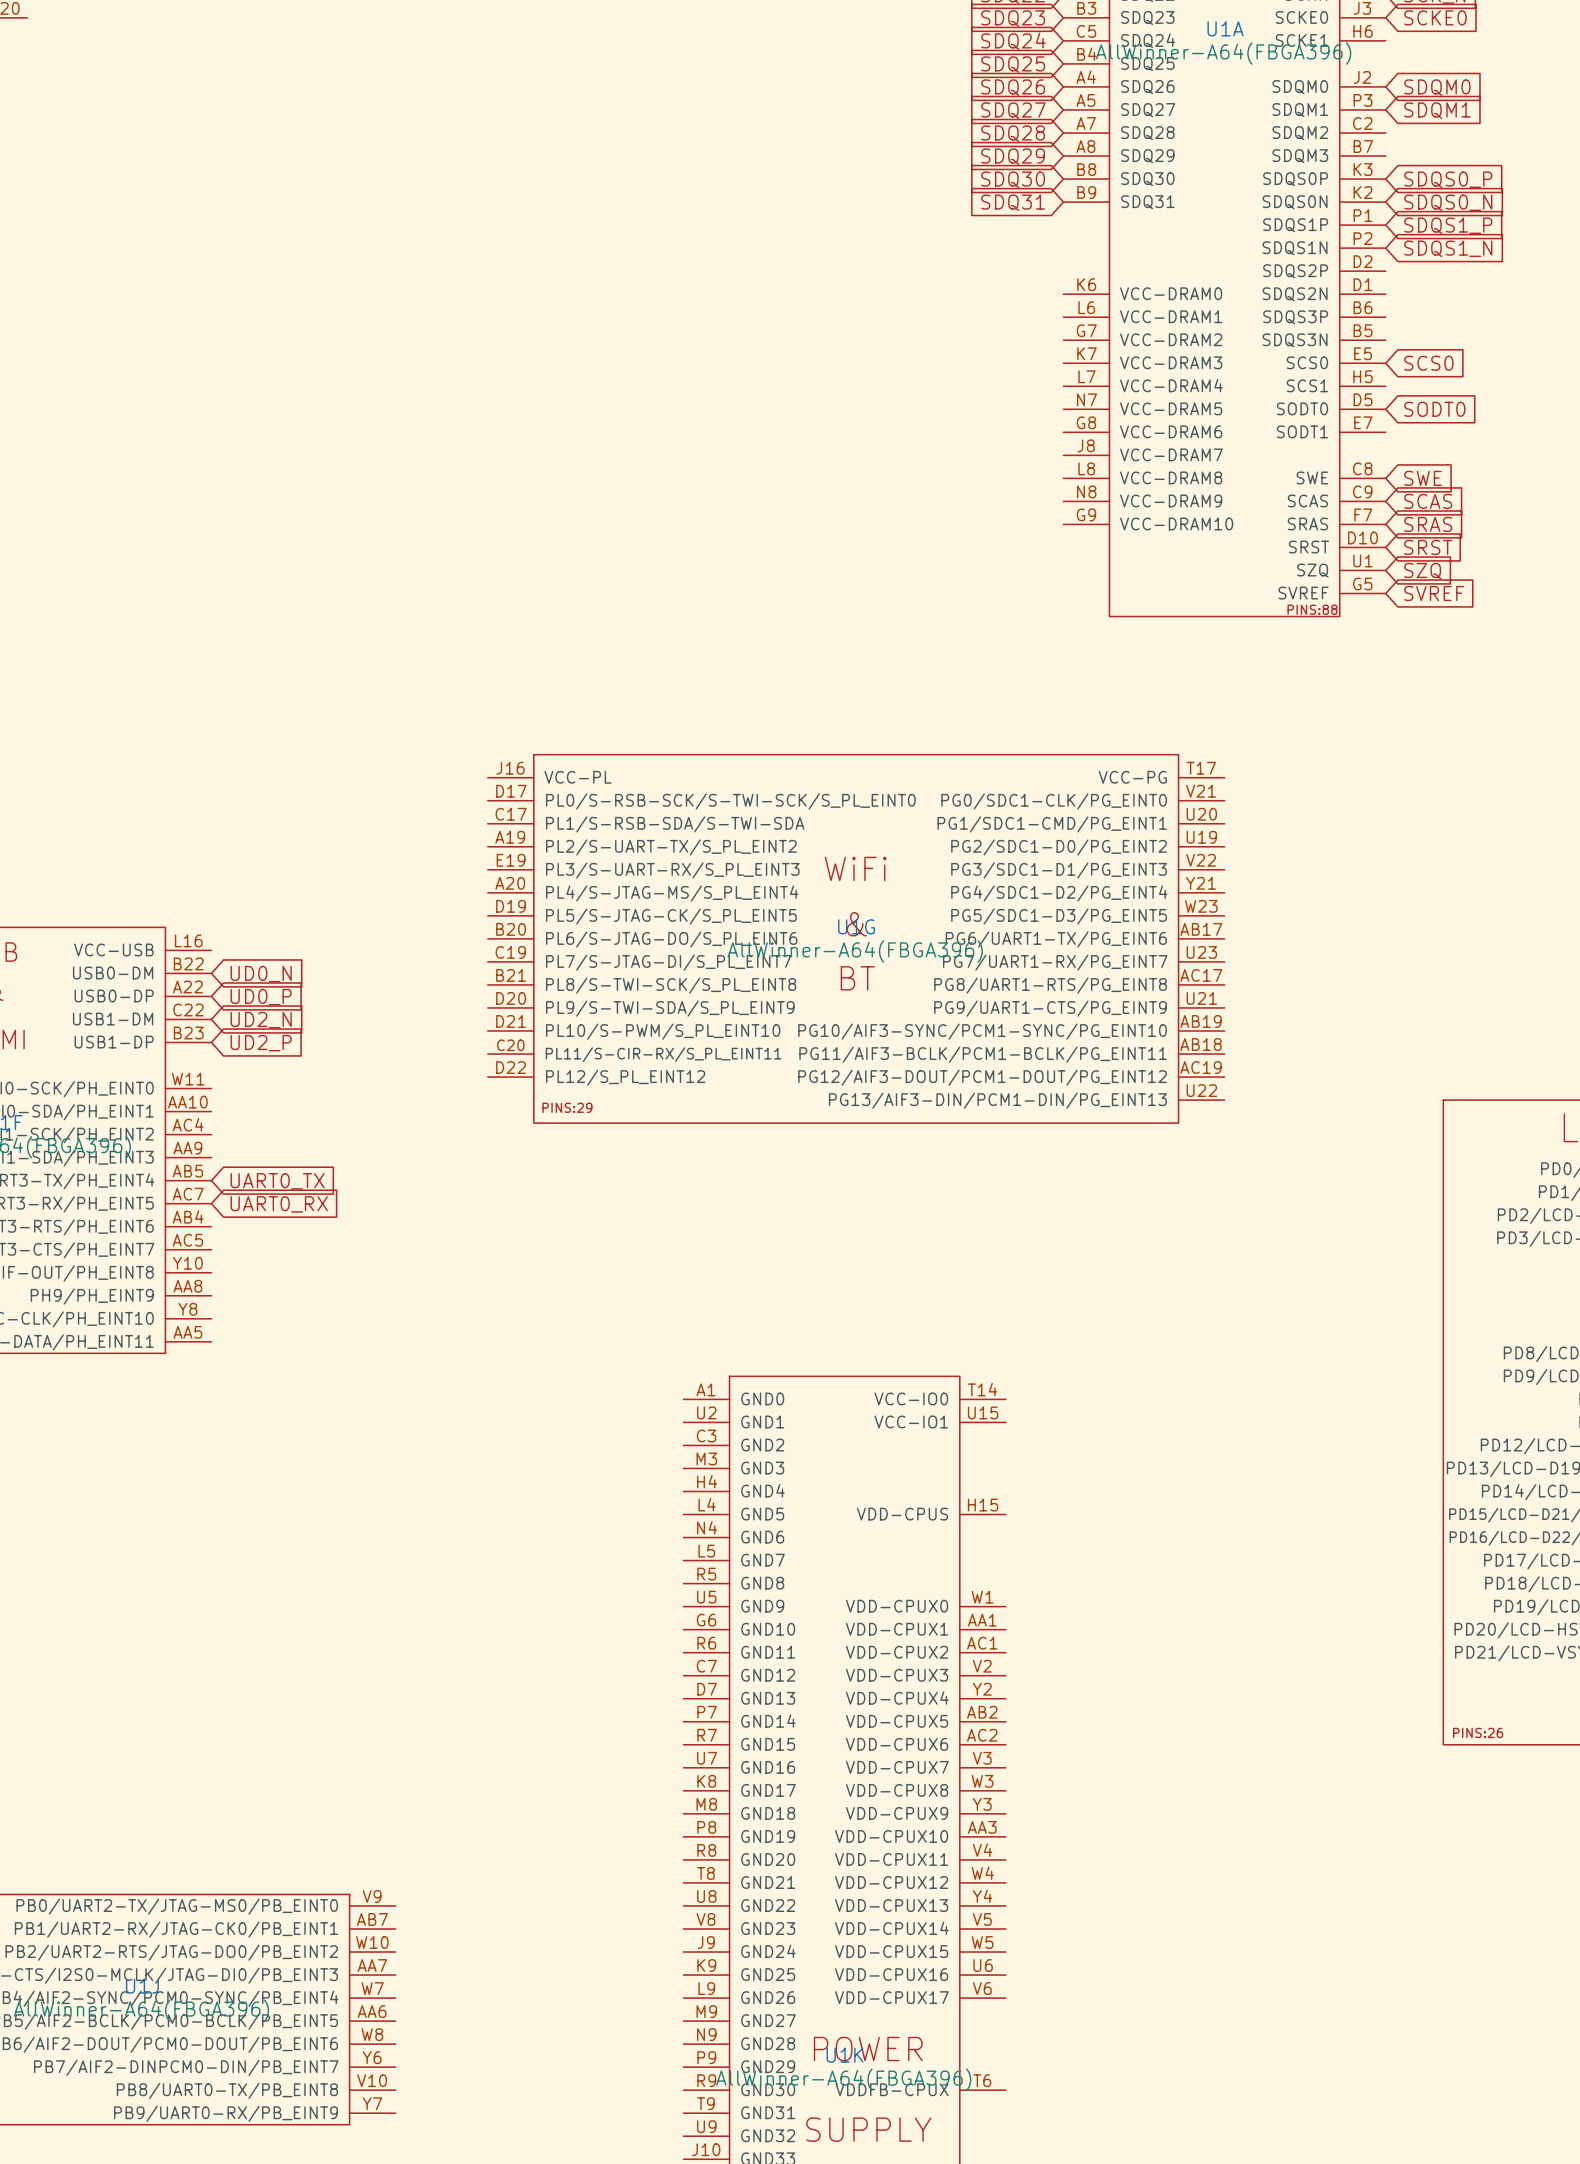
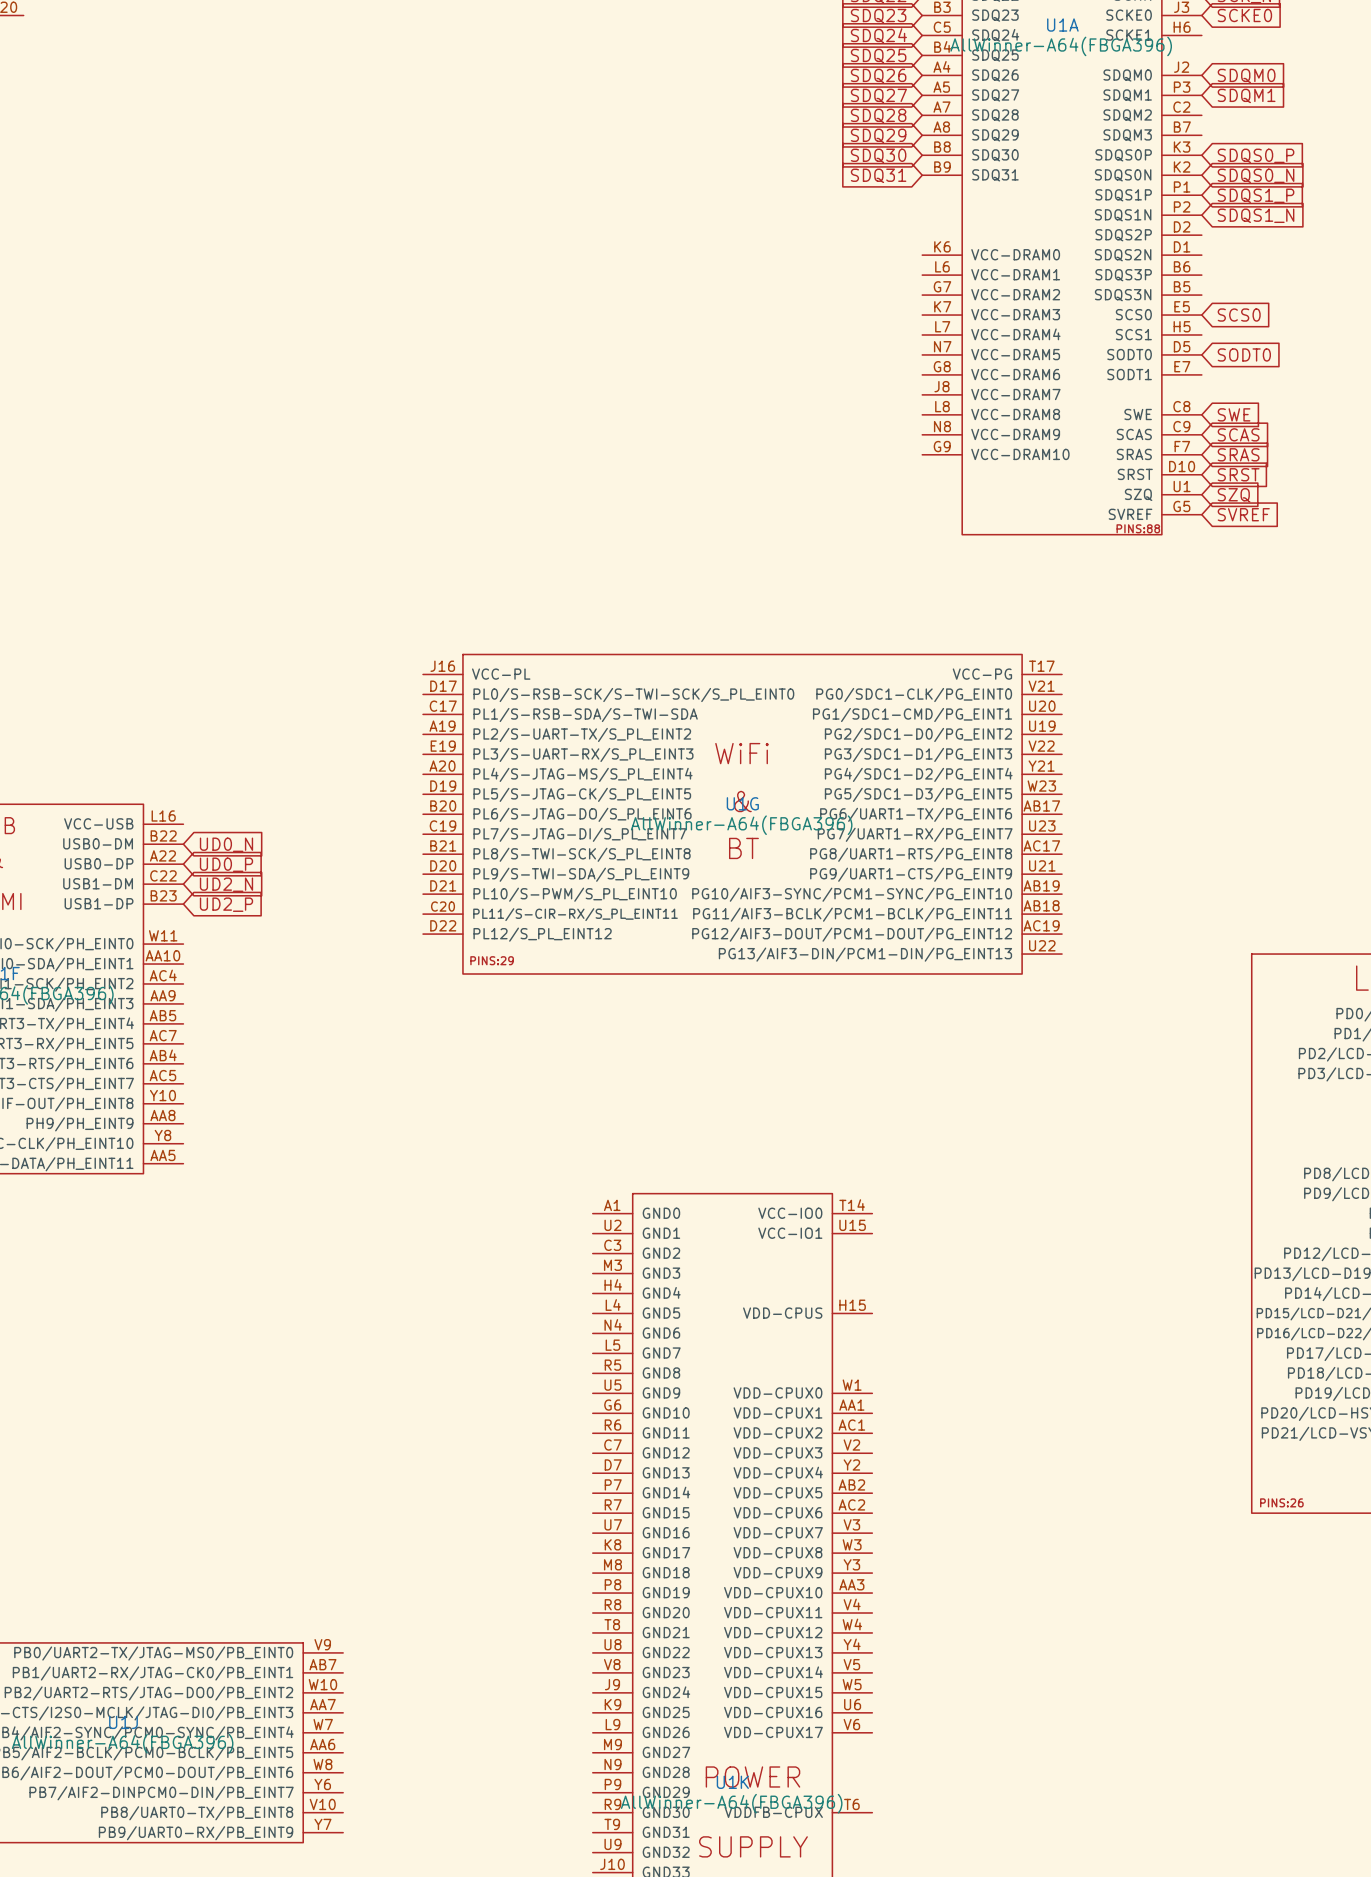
global label: UART0_TX (277, 1181) -> none
global label: UART0_RX (279, 1204) -> none

